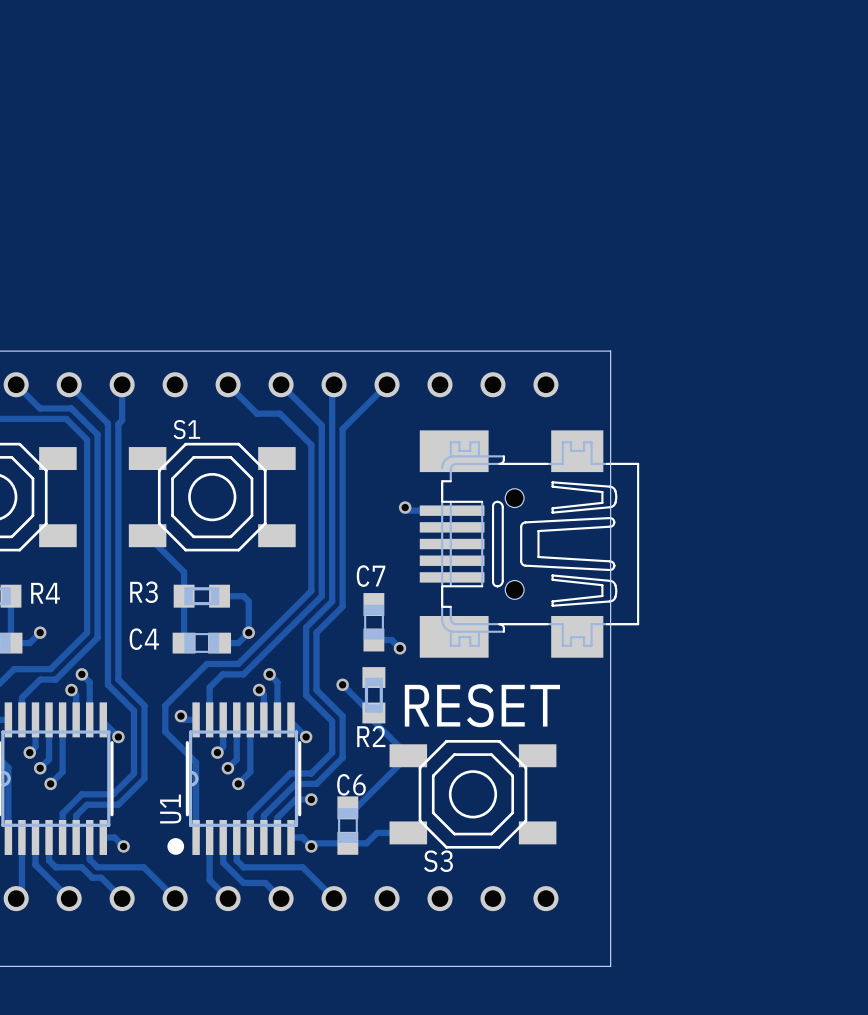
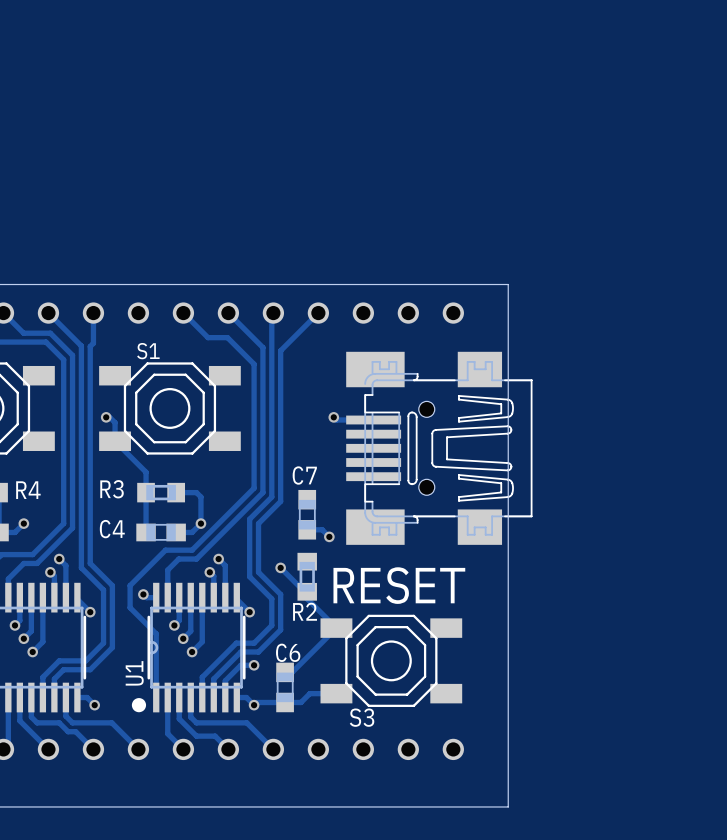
track: none -> (106, 417) (109, 417) (115, 422) (115, 441)
via: none -> (106, 417)

